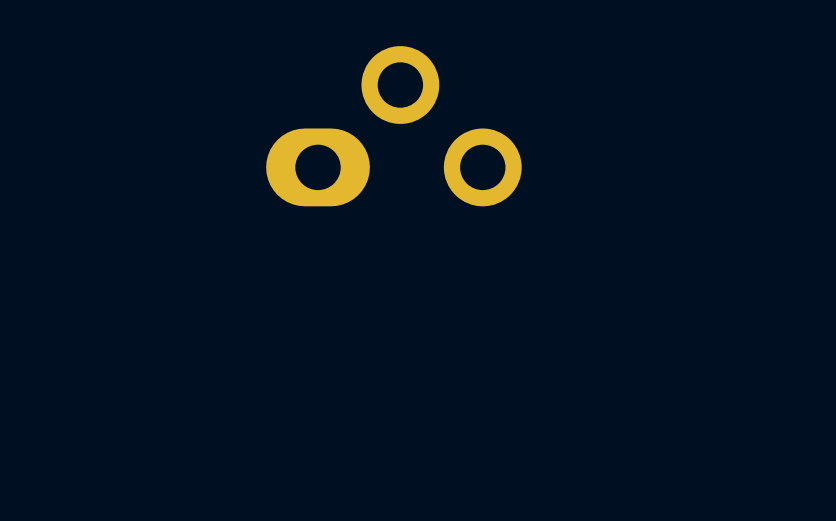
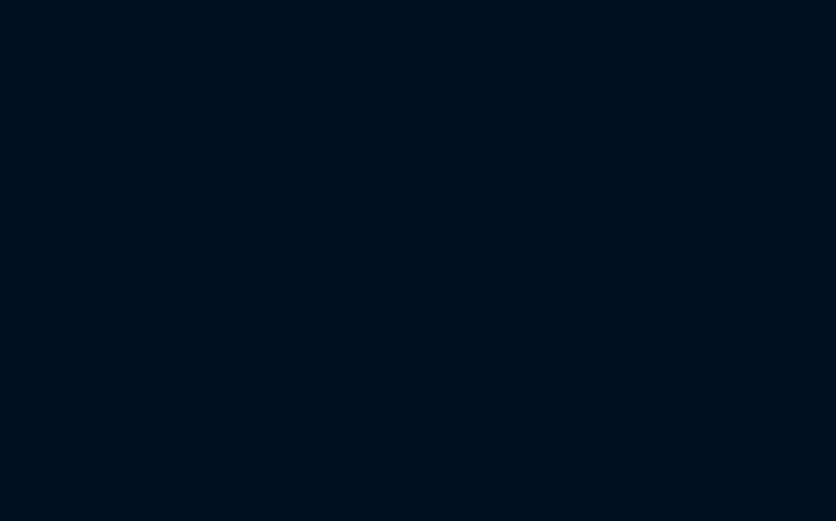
part: (393, 126) -> none

